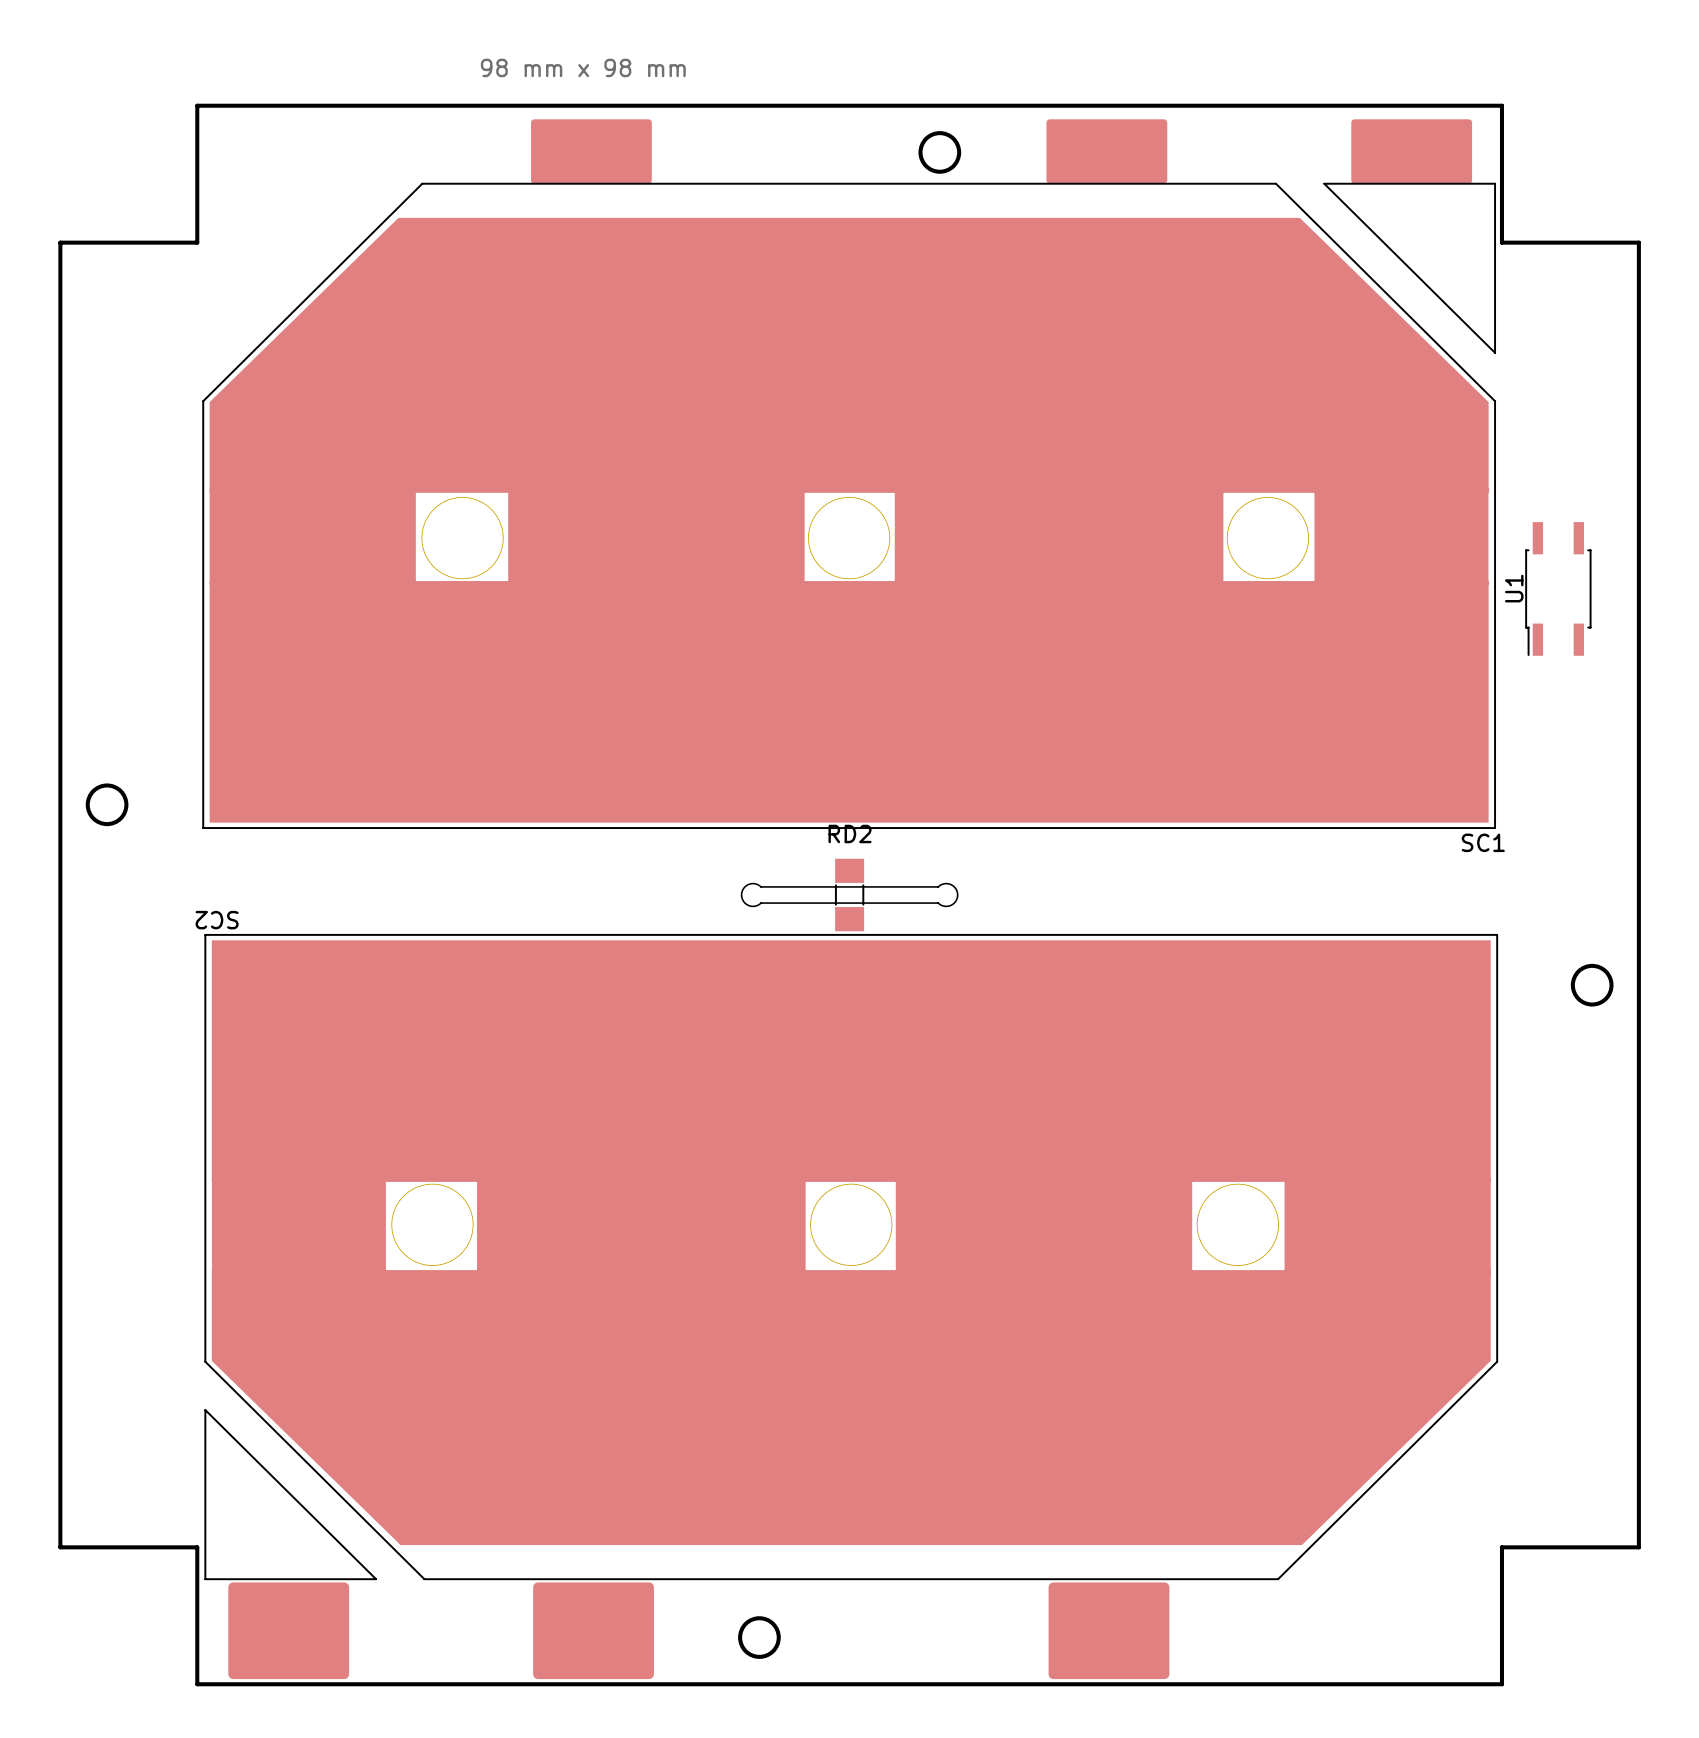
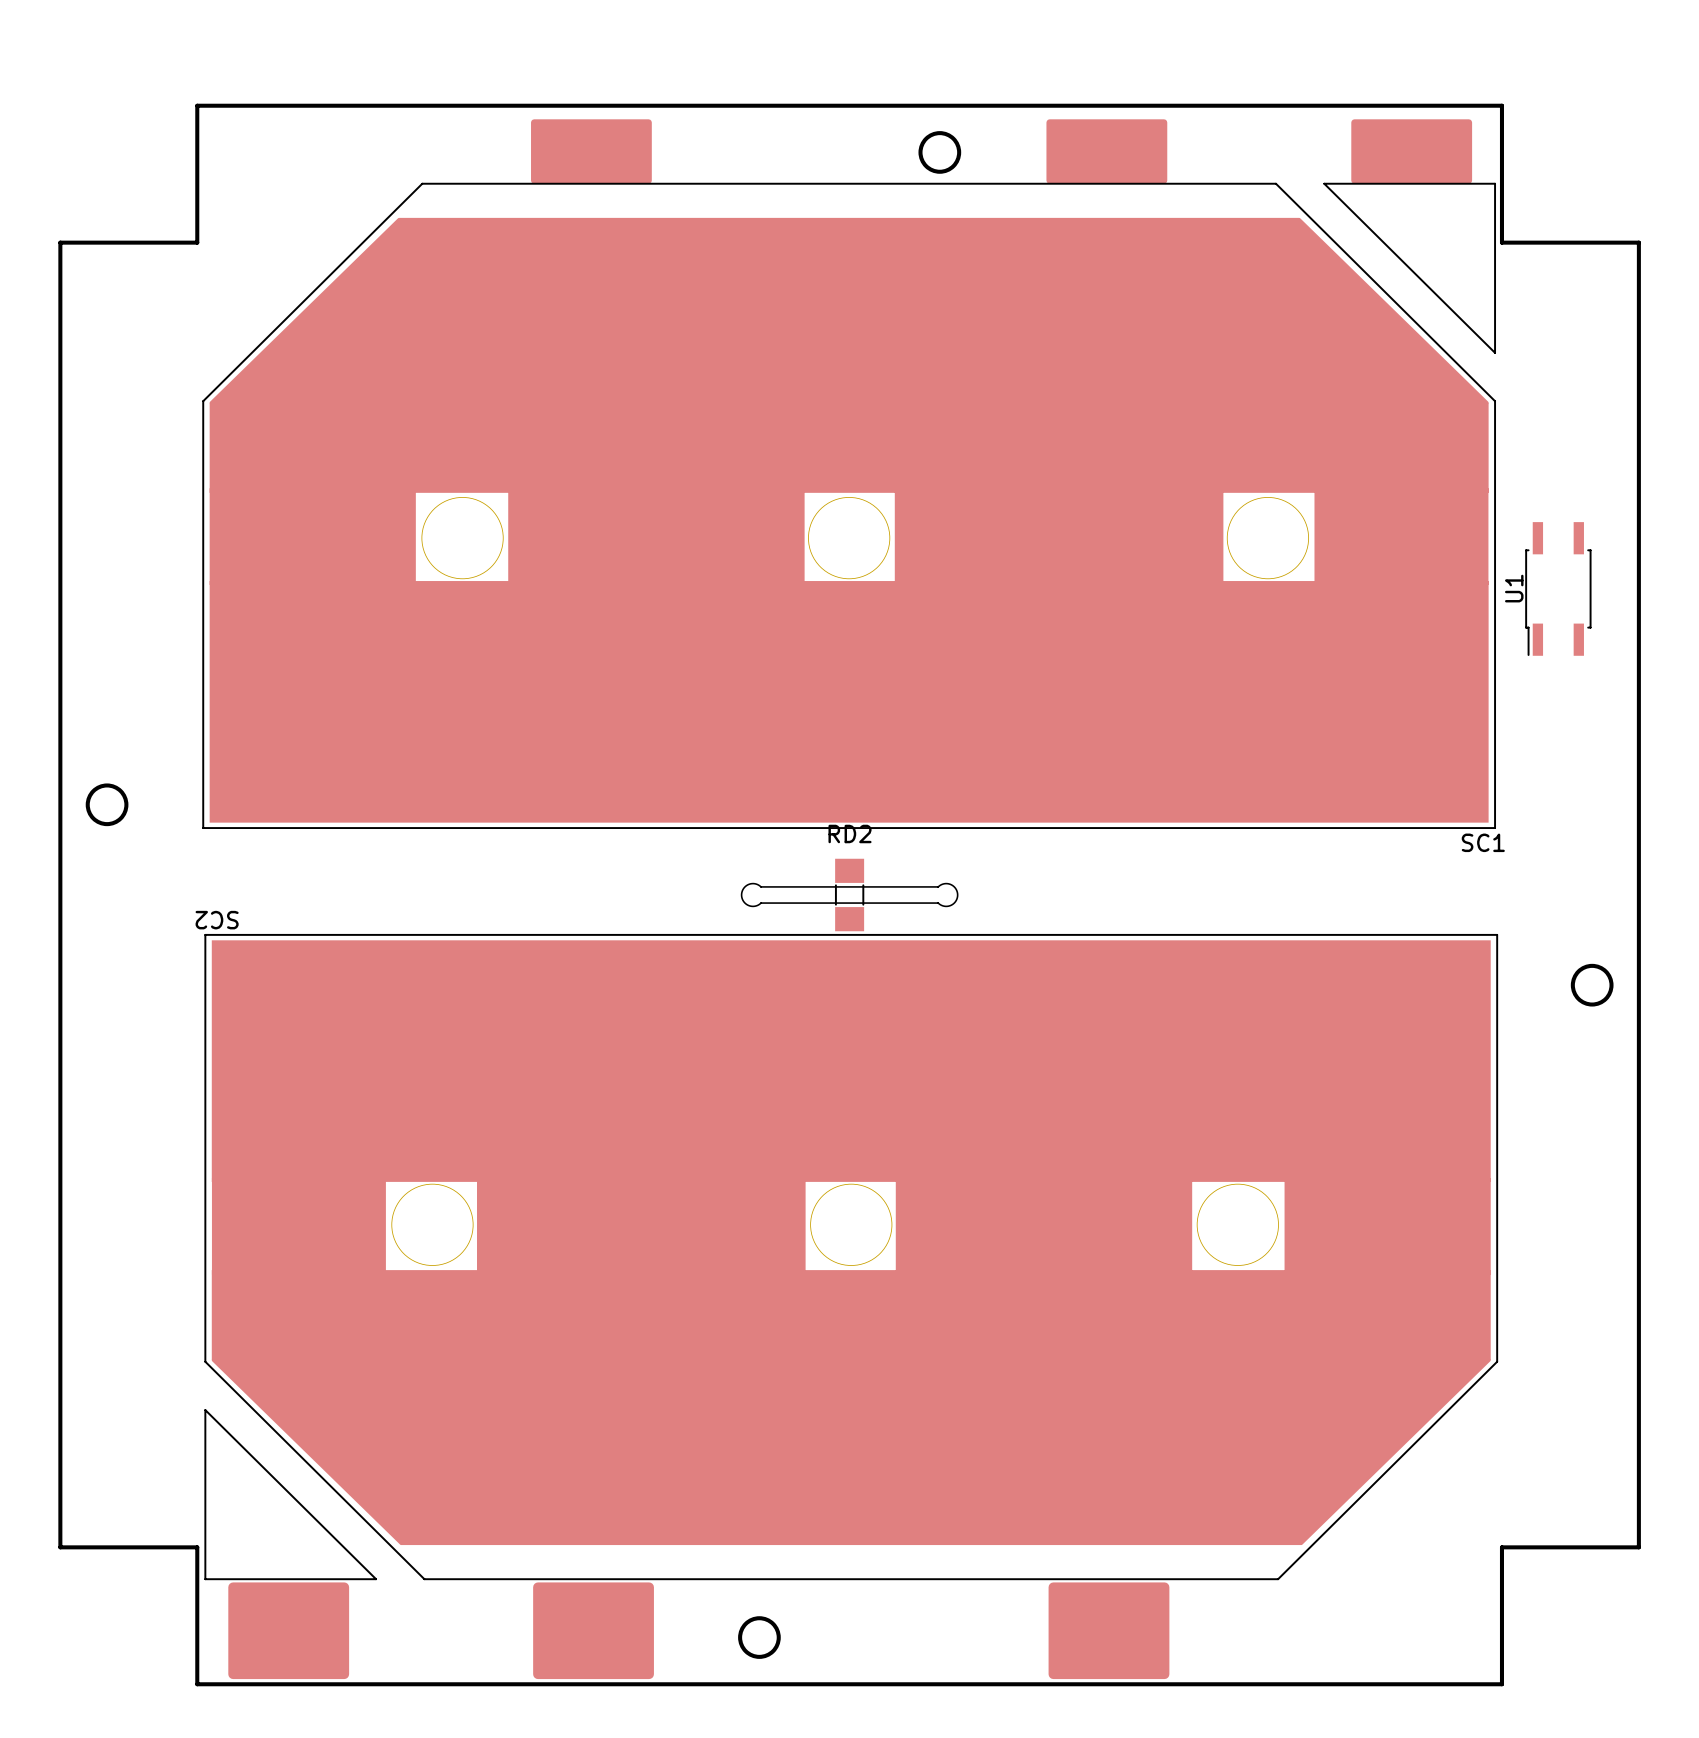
text: 98 mm x 98 mm (583, 67) -> none

